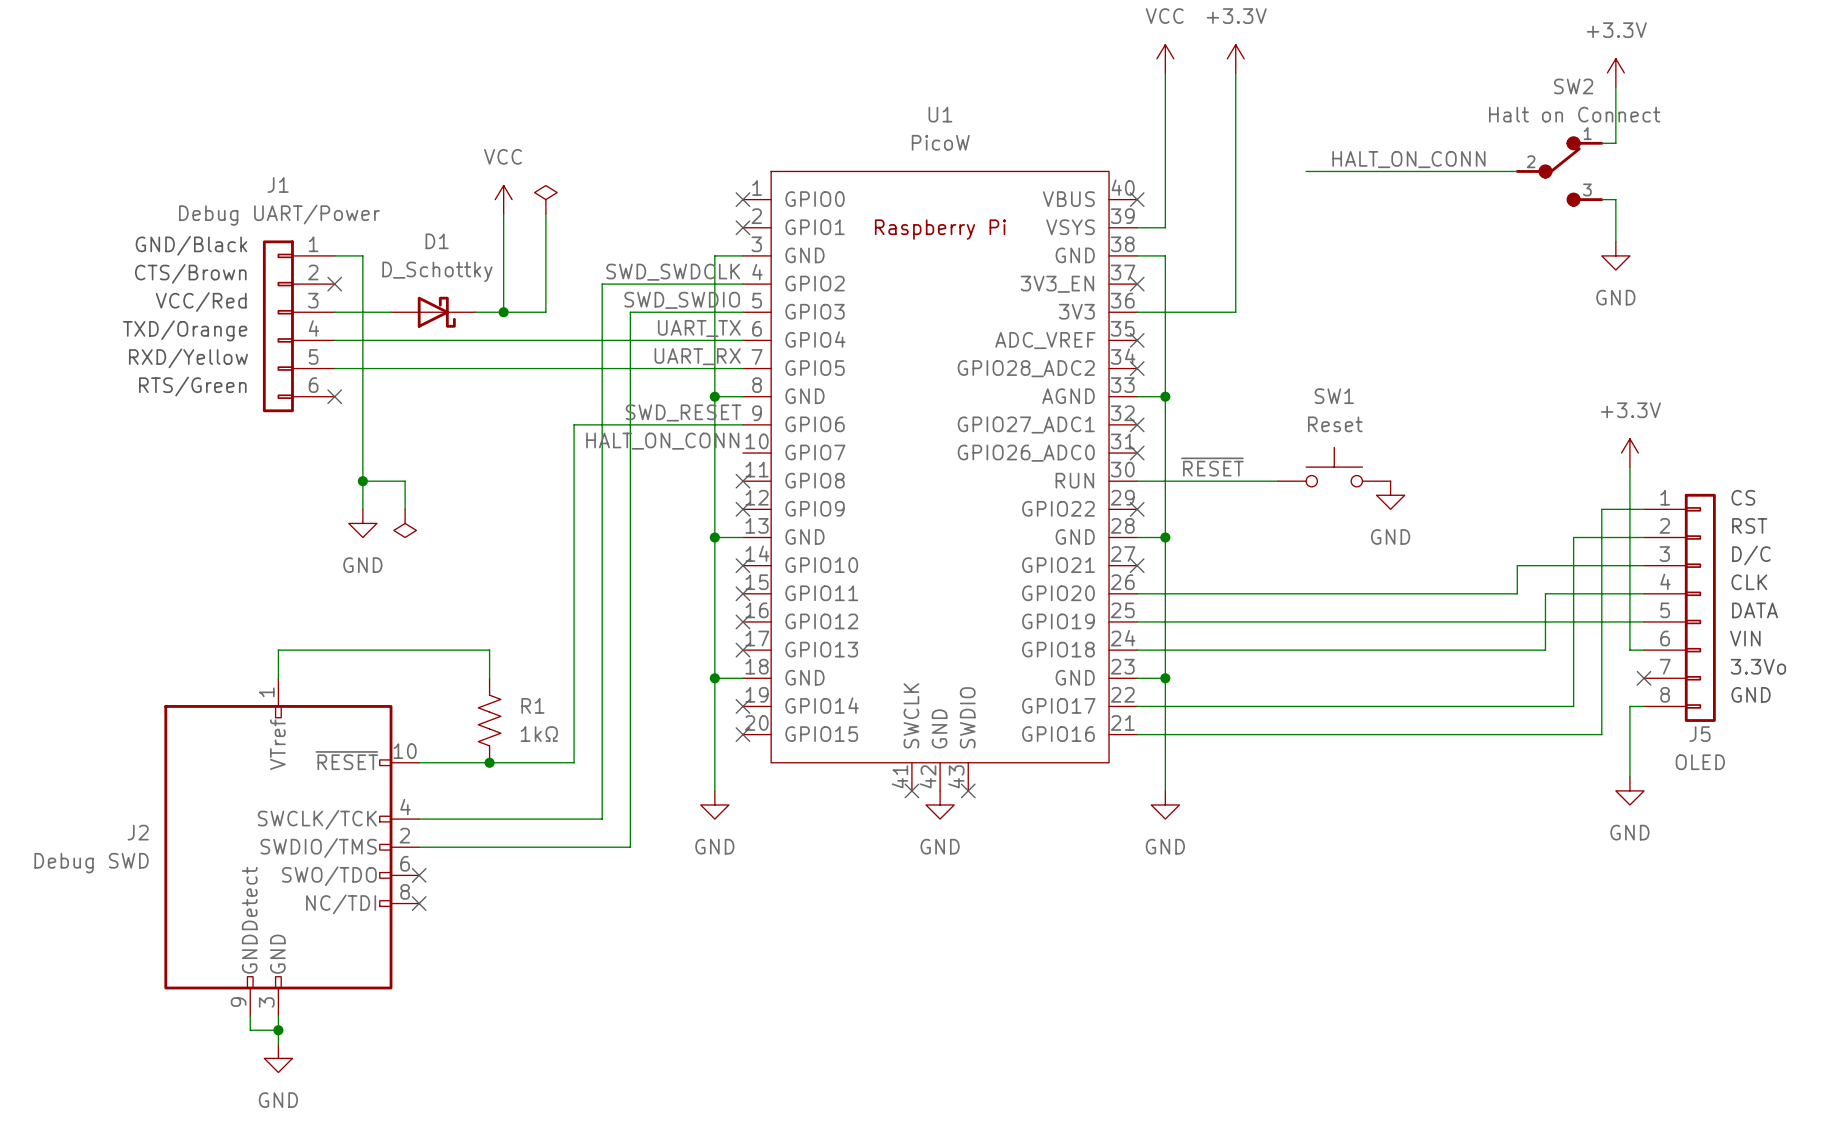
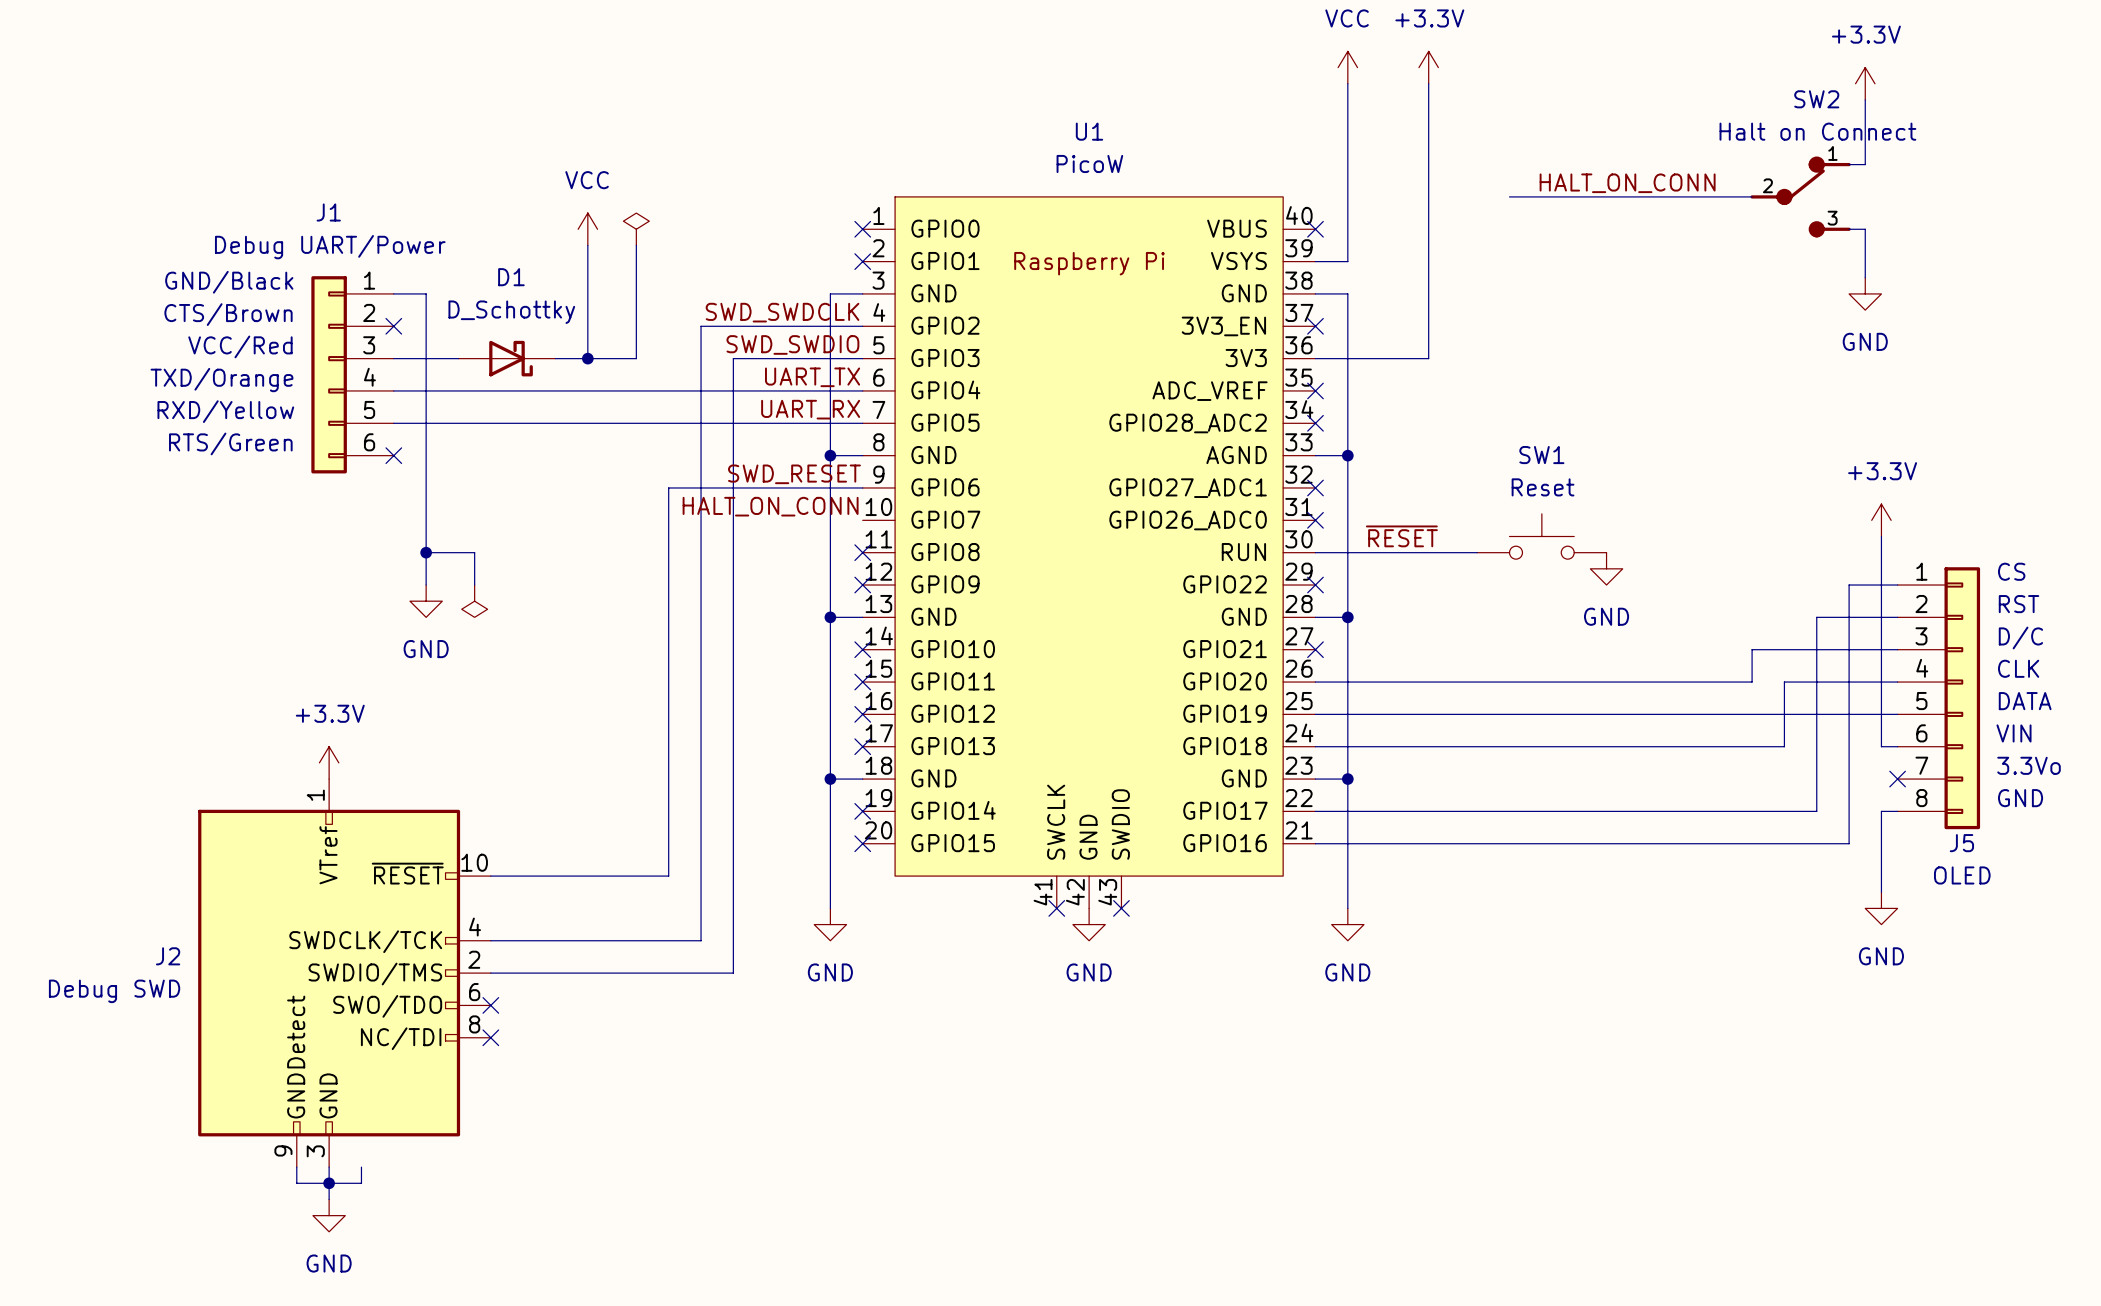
power symbol: none -> +3.3V (329, 762)
wire: (278, 678) (278, 650) (489, 650) (489, 678) -> none
R1: 1kΩ (489, 720) -> none
junction: (489, 762) -> none
J2 pin name: SWCLK/TCK (317, 819) -> SWDCLK/TCK (365, 941)
wire: none -> (361, 1167) (361, 1183) (329, 1183)

